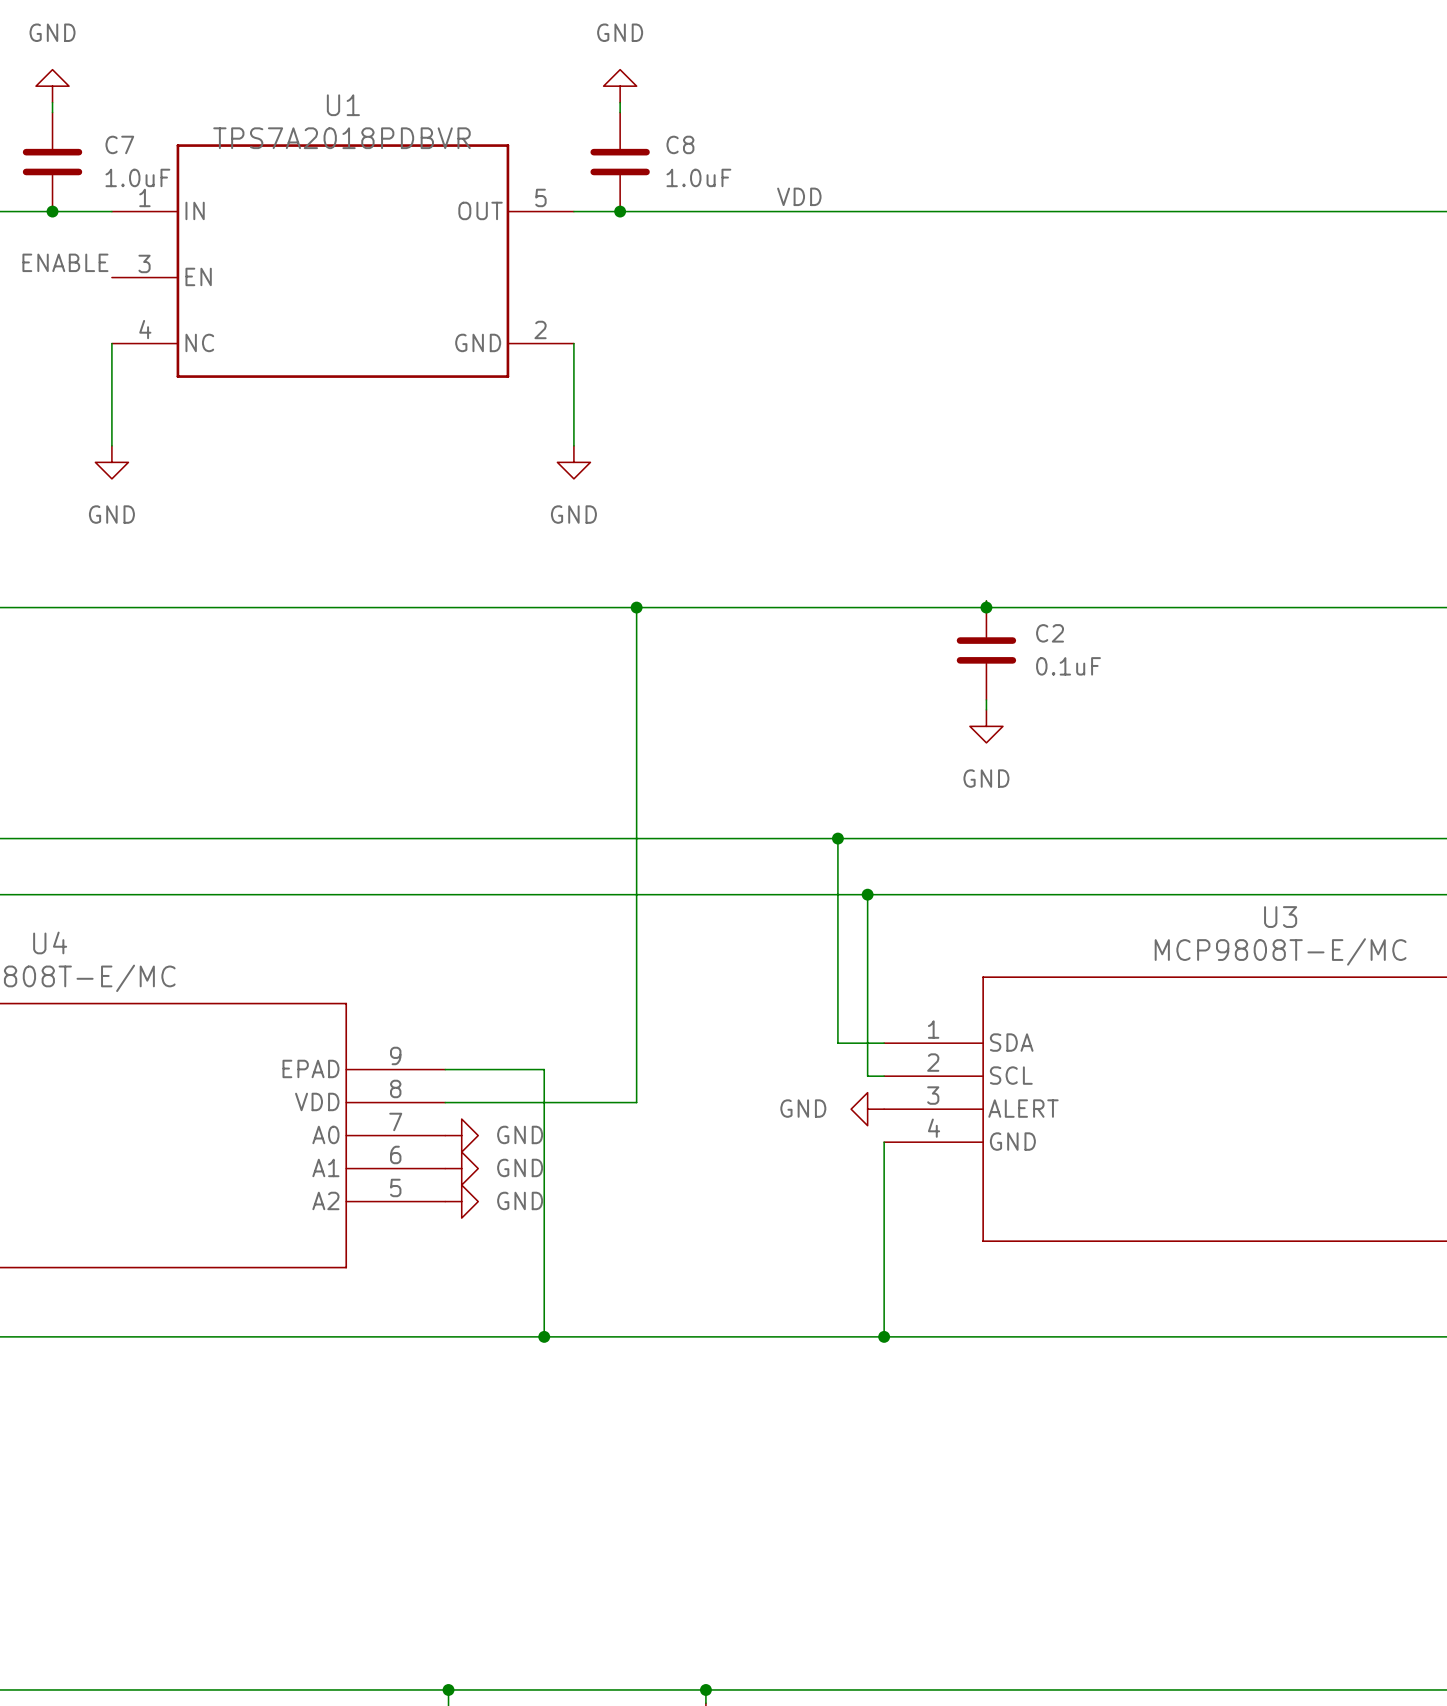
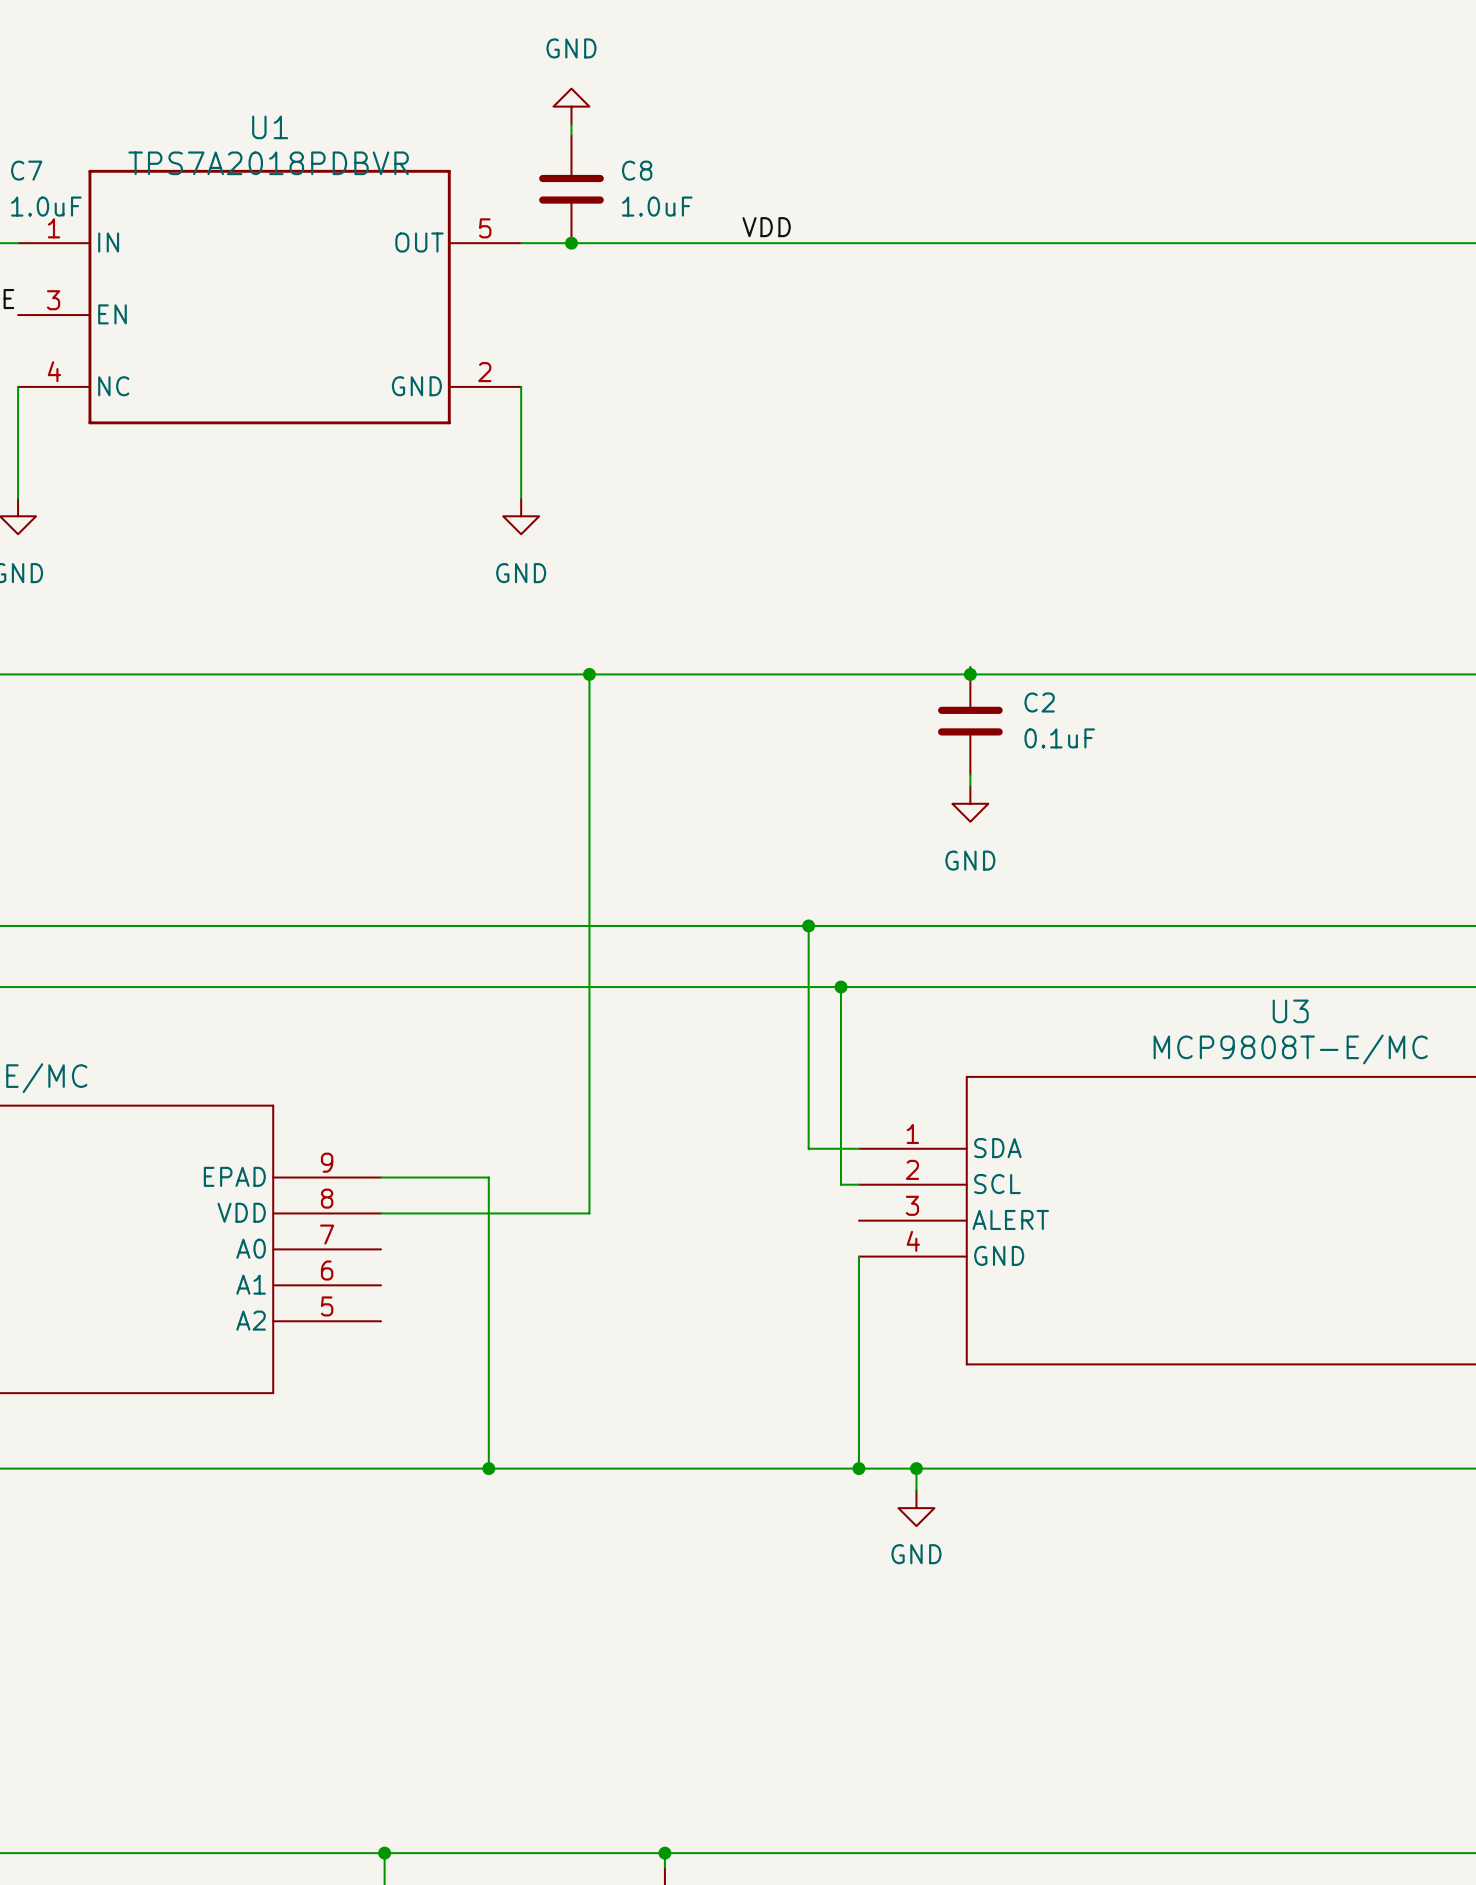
power symbol: GND (867, 1109) -> none
power symbol: GND (461, 1135) -> none
power symbol: GND (461, 1168) -> none
power symbol: GND (461, 1201) -> none
wire: none -> (916, 1468) (916, 1490)
junction: none -> (916, 1468)
power symbol: none -> GND (916, 1508)

